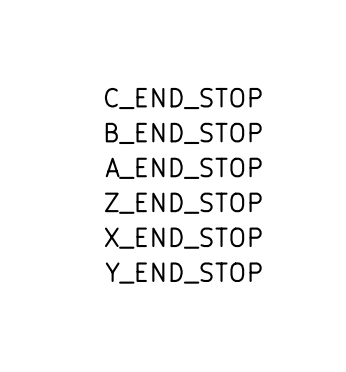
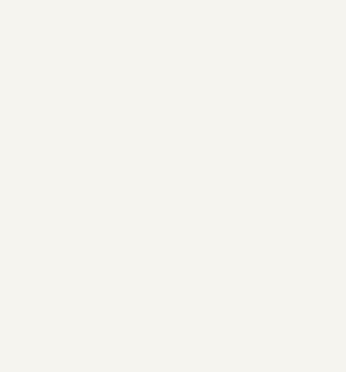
label: C_END_STOP (183, 98) -> none
label: B_END_STOP (183, 133) -> none
label: A_END_STOP (183, 168) -> none
label: Z_END_STOP (183, 203) -> none
label: X_END_STOP (183, 238) -> none
label: Y_END_STOP (183, 273) -> none

